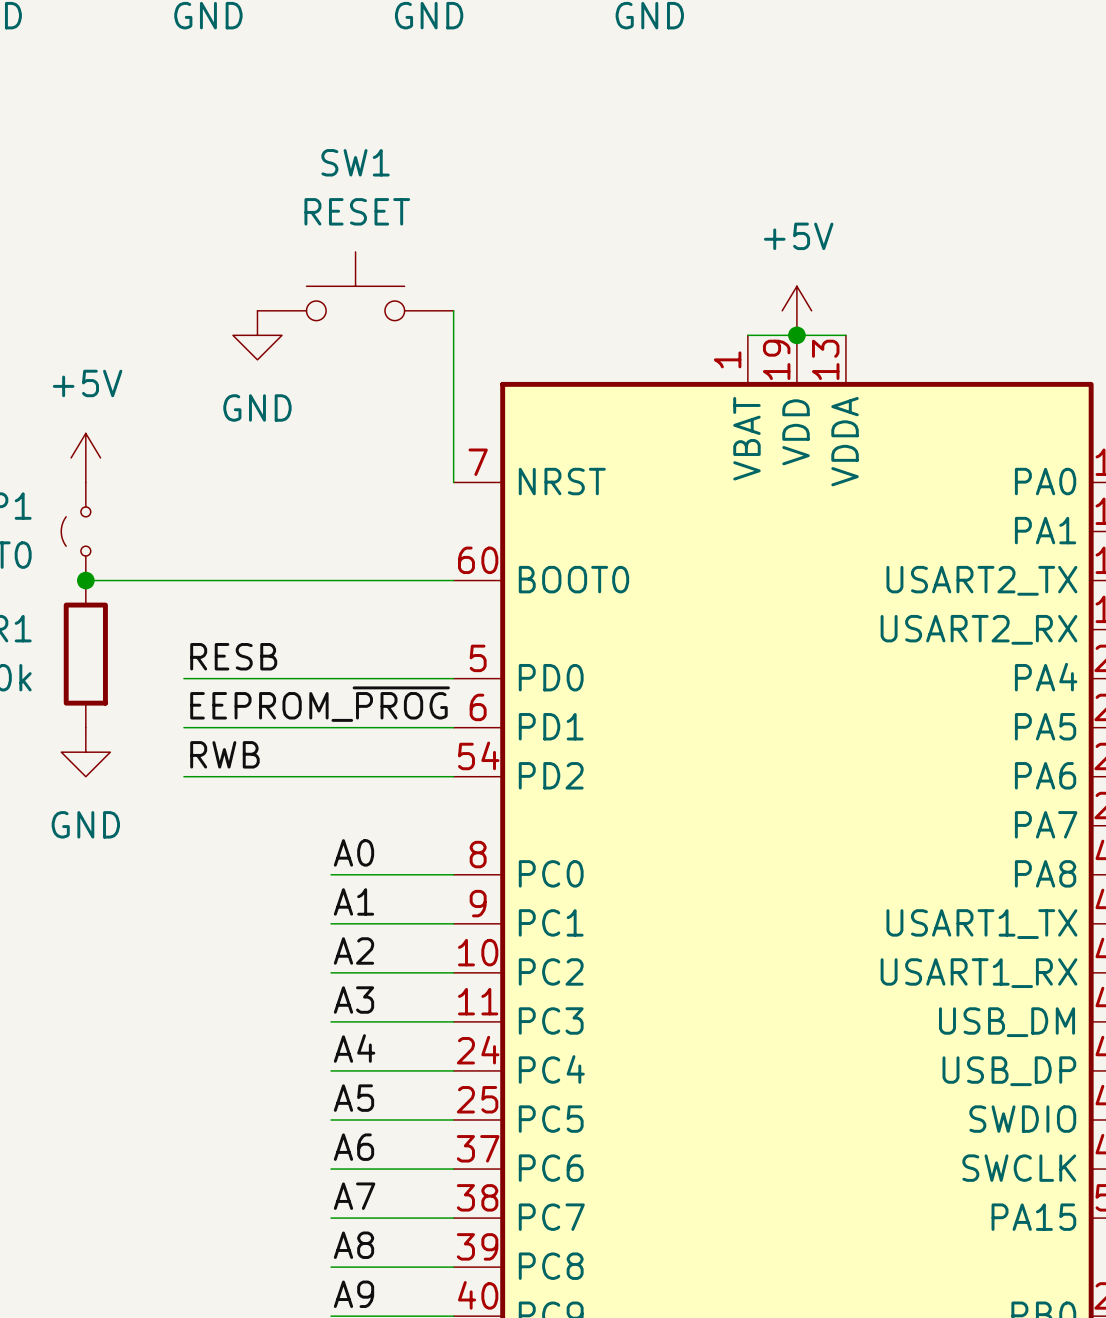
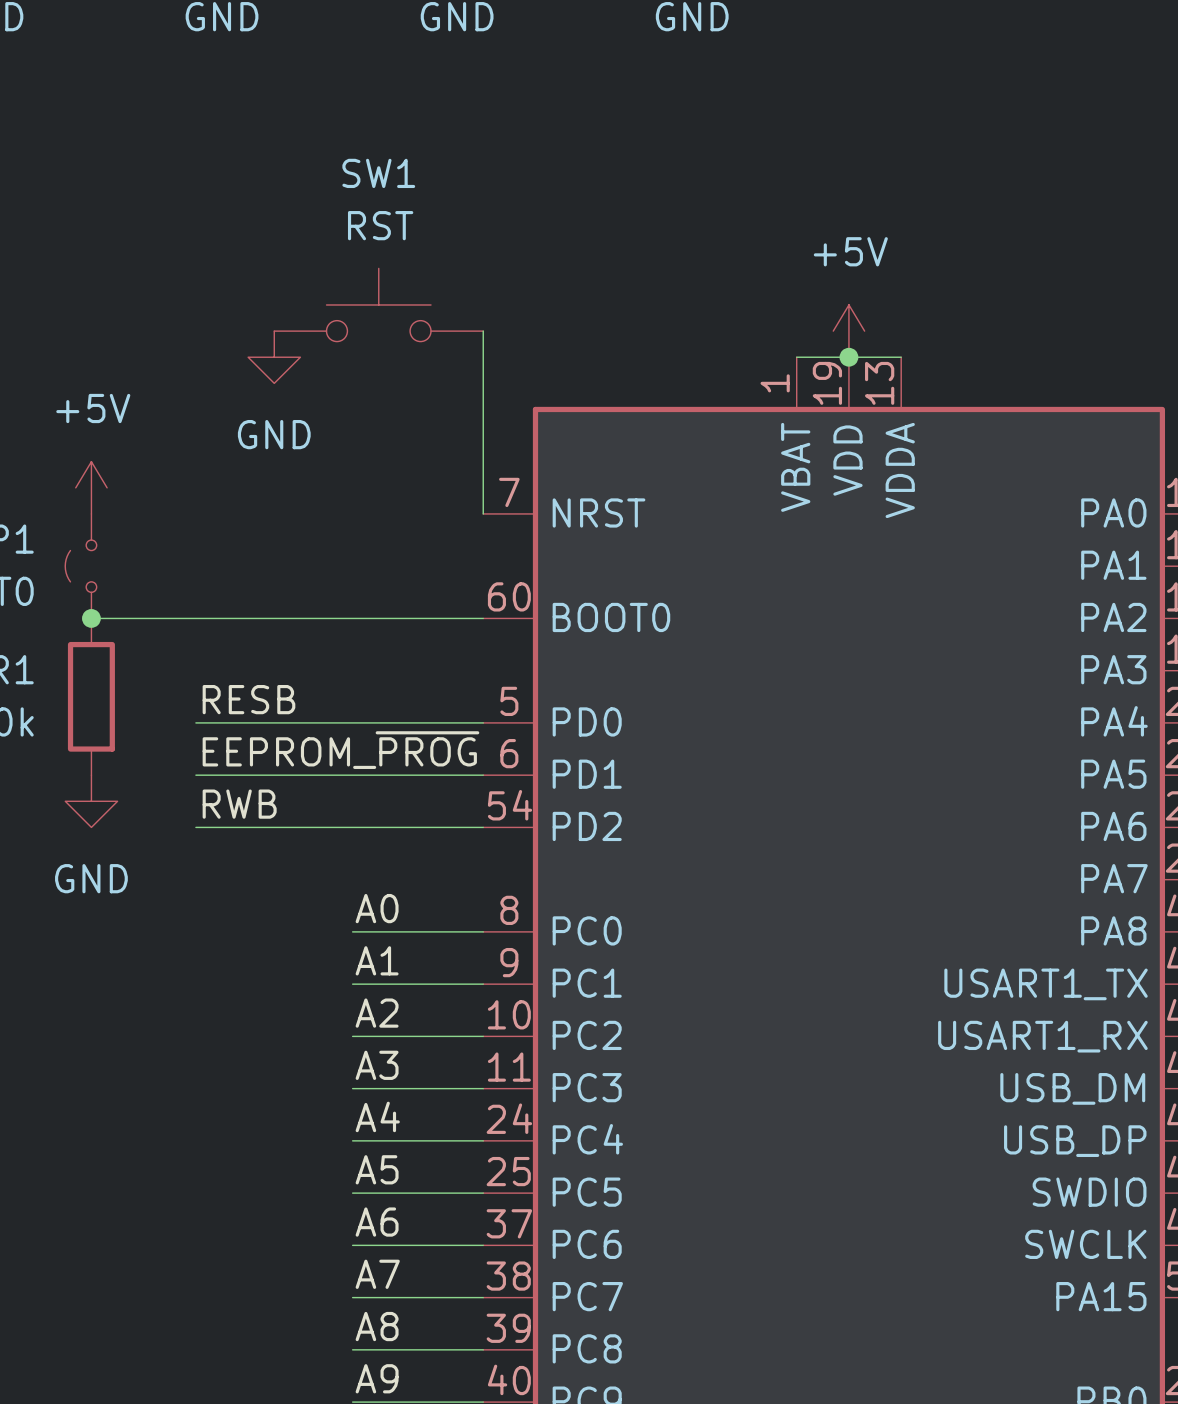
SW1 value: RESET (357, 211) -> RST (380, 225)
part pin name: USART2_TX (981, 580) -> PA2 (1113, 617)
part pin name: USART2_RX (979, 629) -> PA3 (1113, 669)

